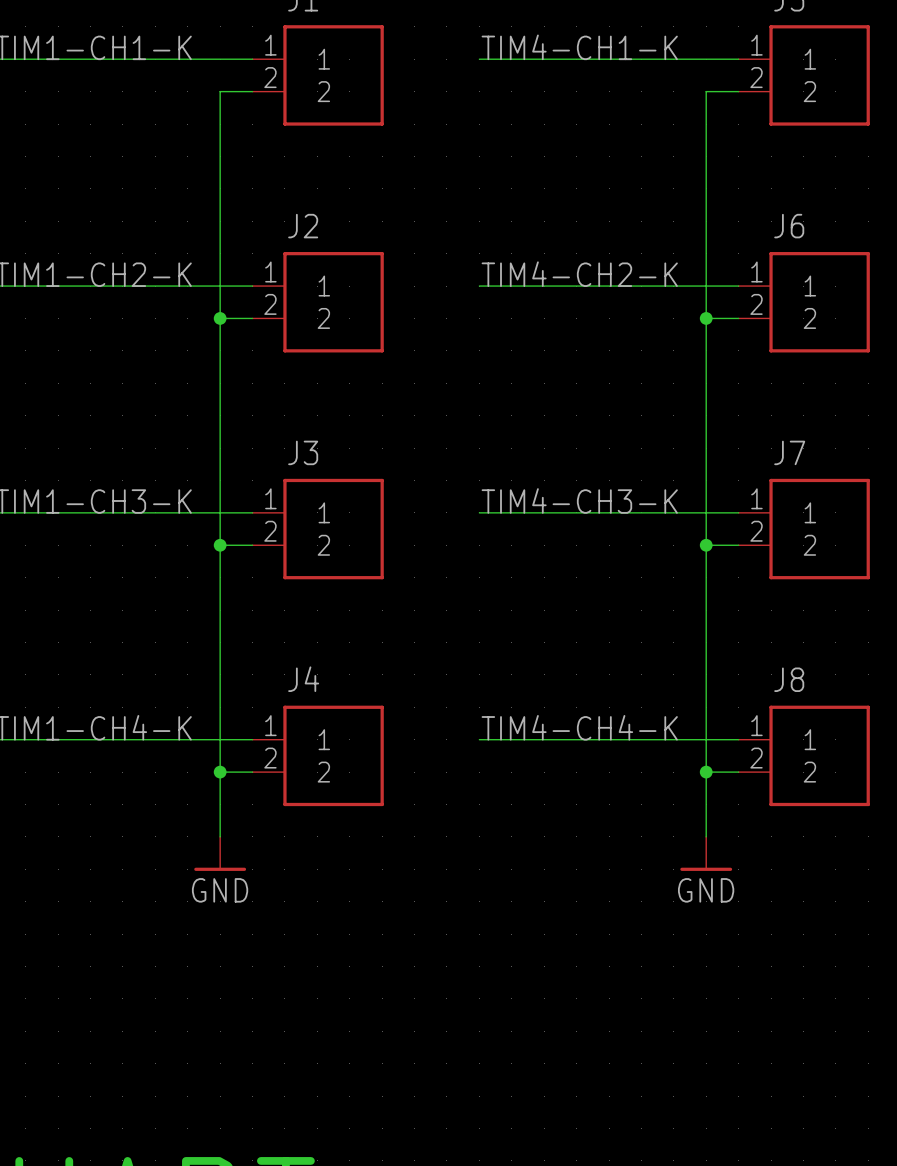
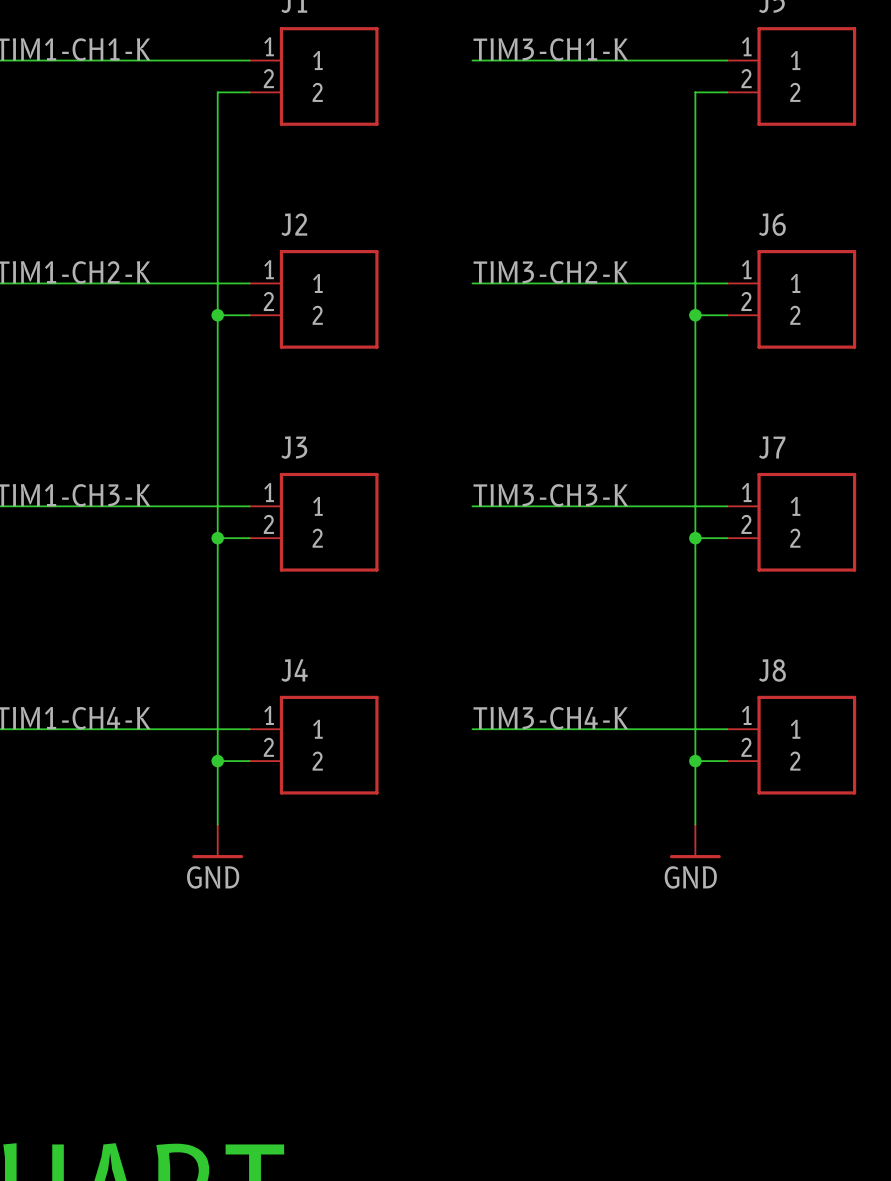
label: TIM4-CH1-K (579, 47) -> TIM3-CH1-K (550, 49)
label: TIM4-CH2-K (579, 274) -> TIM3-CH2-K (550, 272)
label: TIM4-CH3-K (579, 500) -> TIM3-CH3-K (550, 495)
label: TIM4-CH4-K (579, 727) -> TIM3-CH4-K (550, 718)

